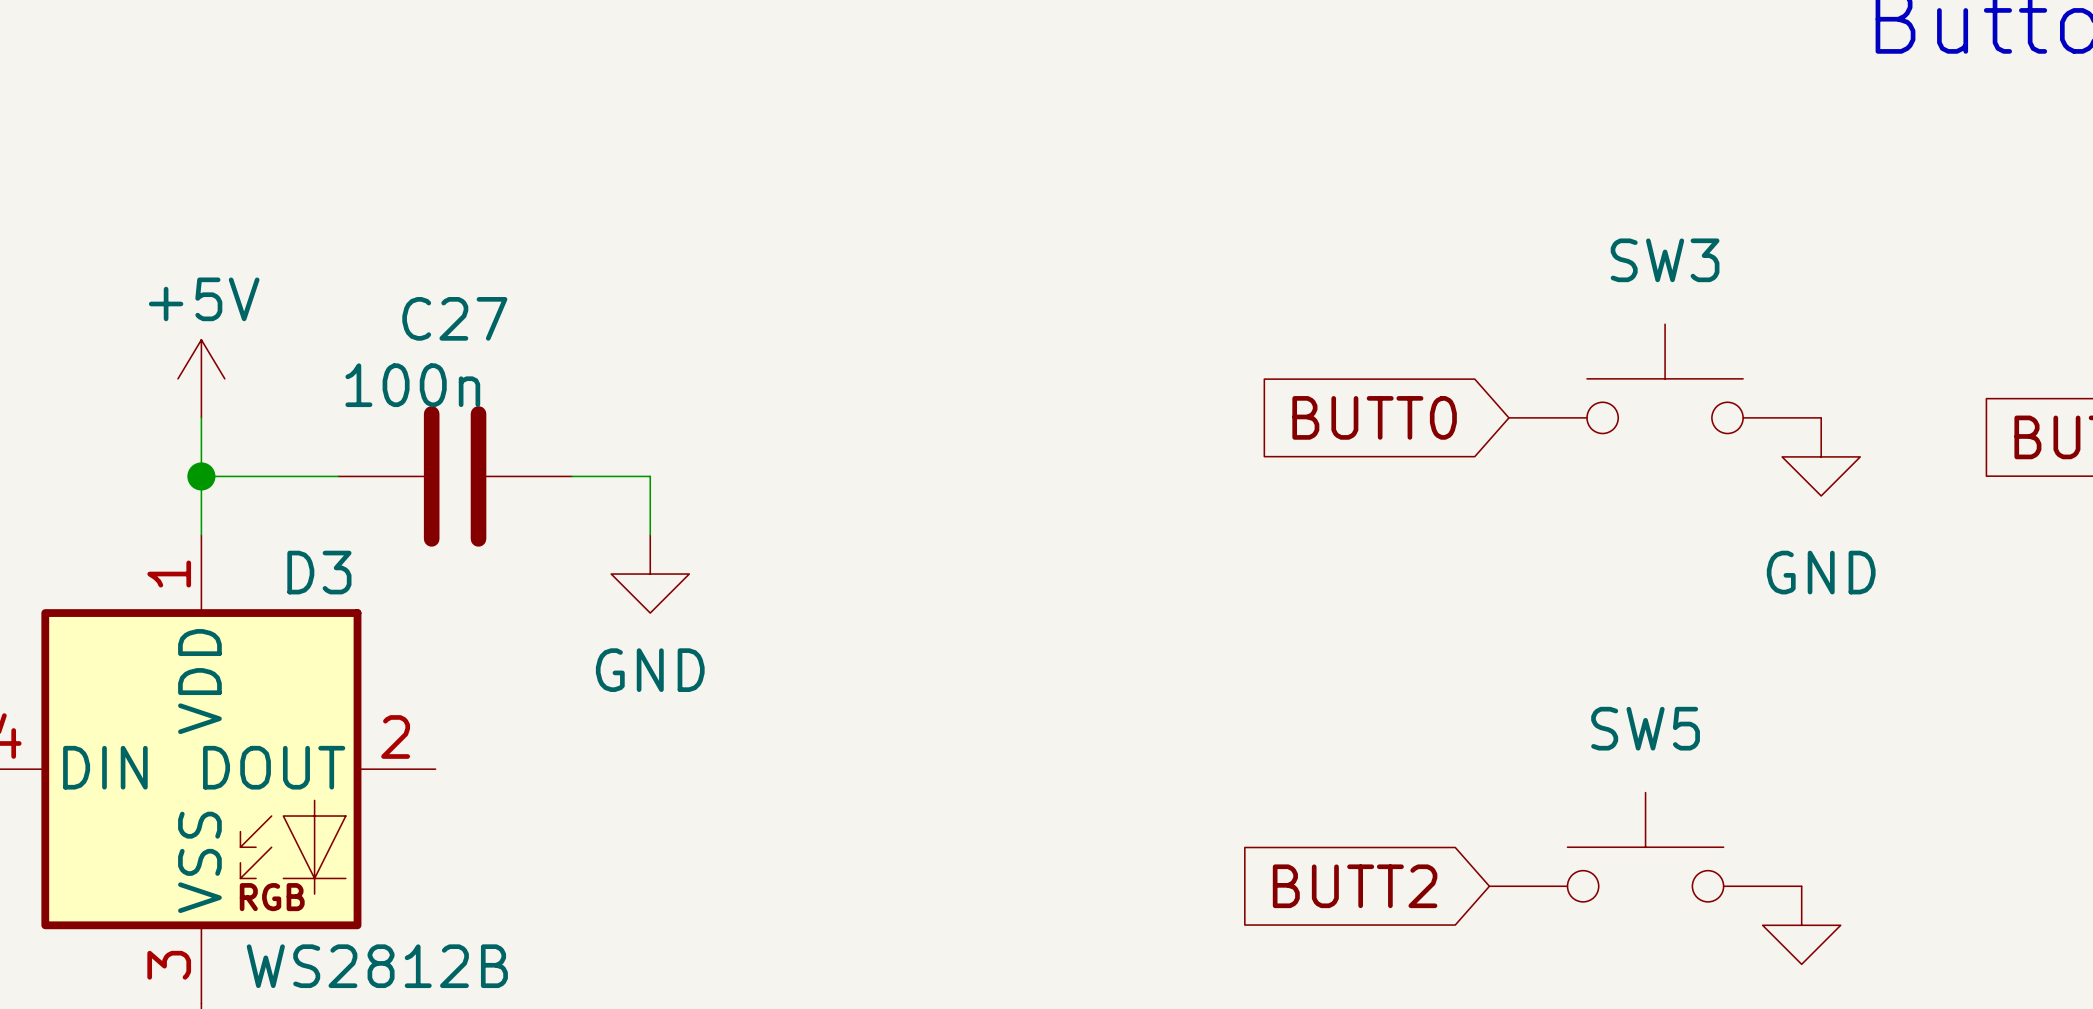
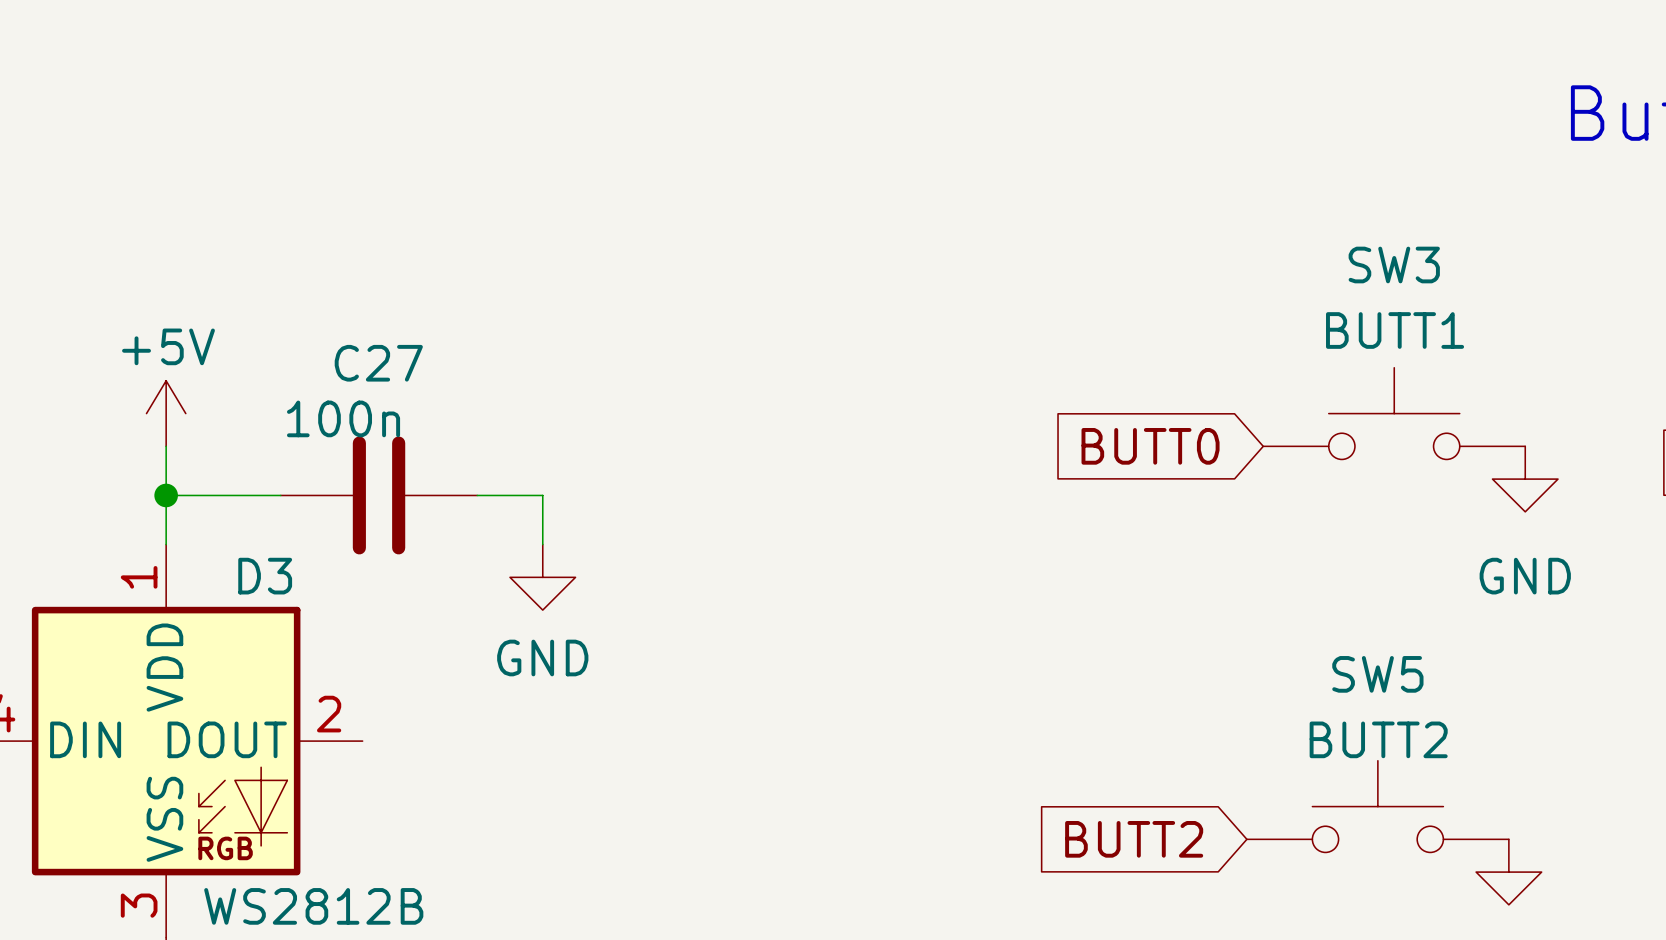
SW3 name position: SW3 (1665, 260) -> SW3 (1394, 265)
SW3 value: none -> BUTT1 (1395, 330)
SW5 name position: SW5 (1645, 728) -> SW5 (1377, 674)
SW5 value: none -> BUTT2 (1378, 739)

